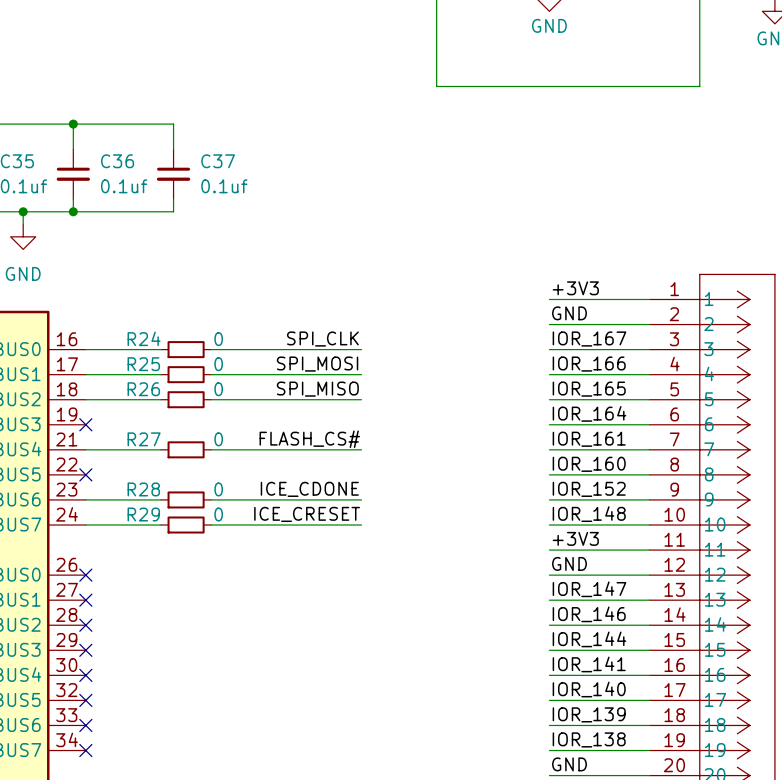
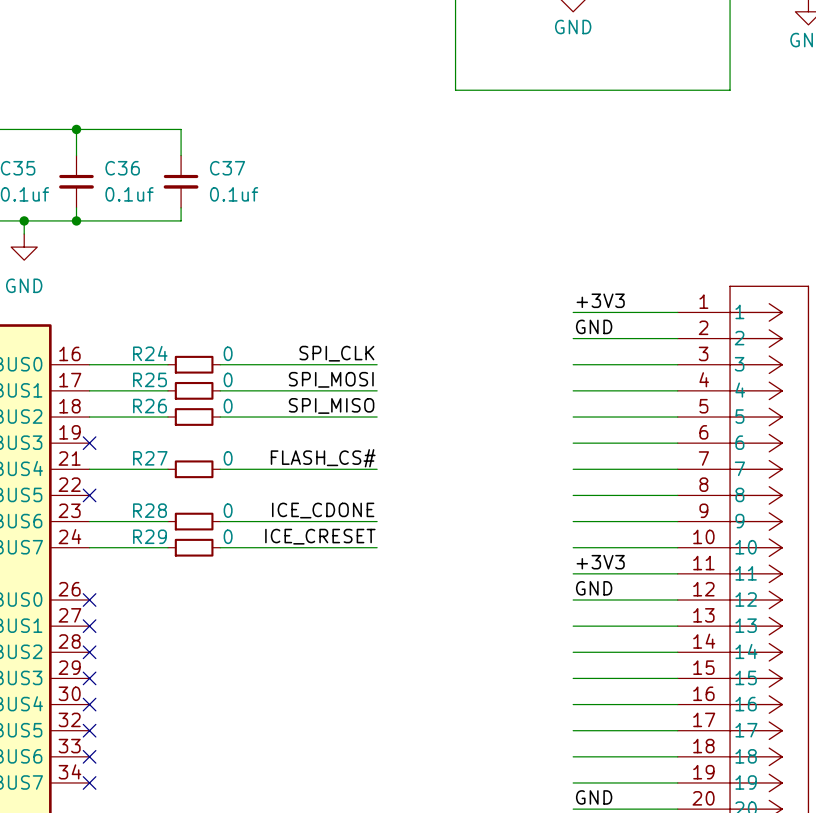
label: IOR_167 (589, 339) -> none
label: IOR_166 (589, 364) -> none
label: IOR_165 (589, 389) -> none
label: IOR_164 (589, 413) -> none
label: IOR_161 (589, 439) -> none
label: IOR_160 (589, 464) -> none
label: IOR_152 (589, 489) -> none
label: IOR_148 (589, 514) -> none
label: IOR_147 (589, 589) -> none
label: IOR_146 (589, 614) -> none
label: IOR_144 (589, 639) -> none
label: IOR_141 (589, 664) -> none
label: IOR_140 (589, 689) -> none
label: IOR_139 (589, 714) -> none
label: IOR_138 (589, 739) -> none

